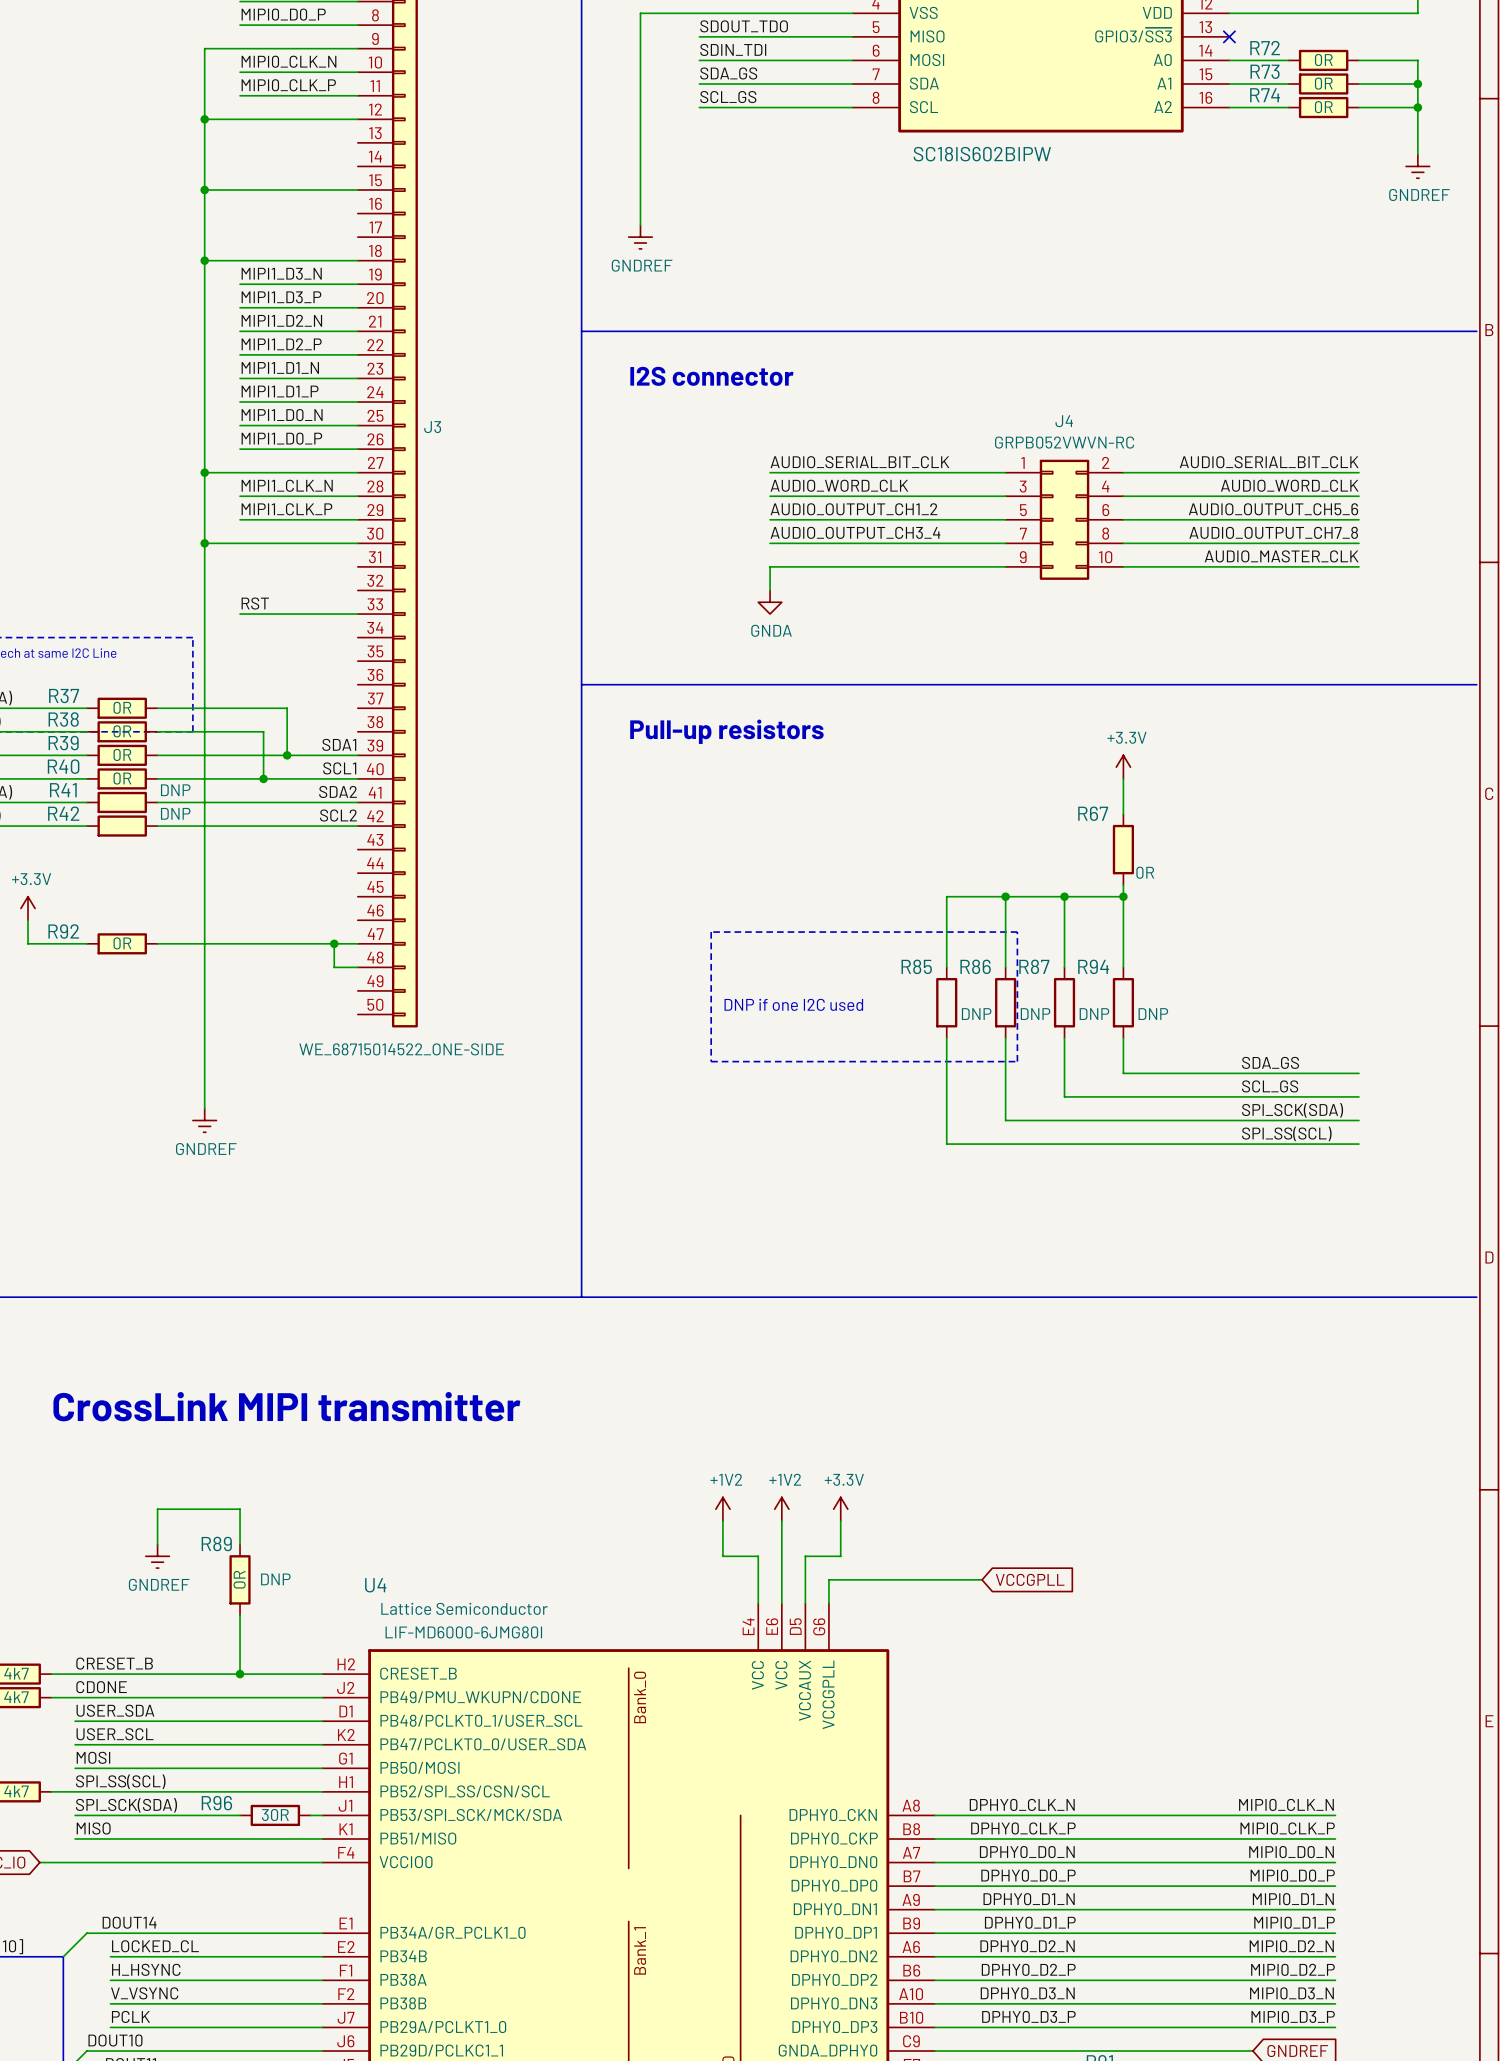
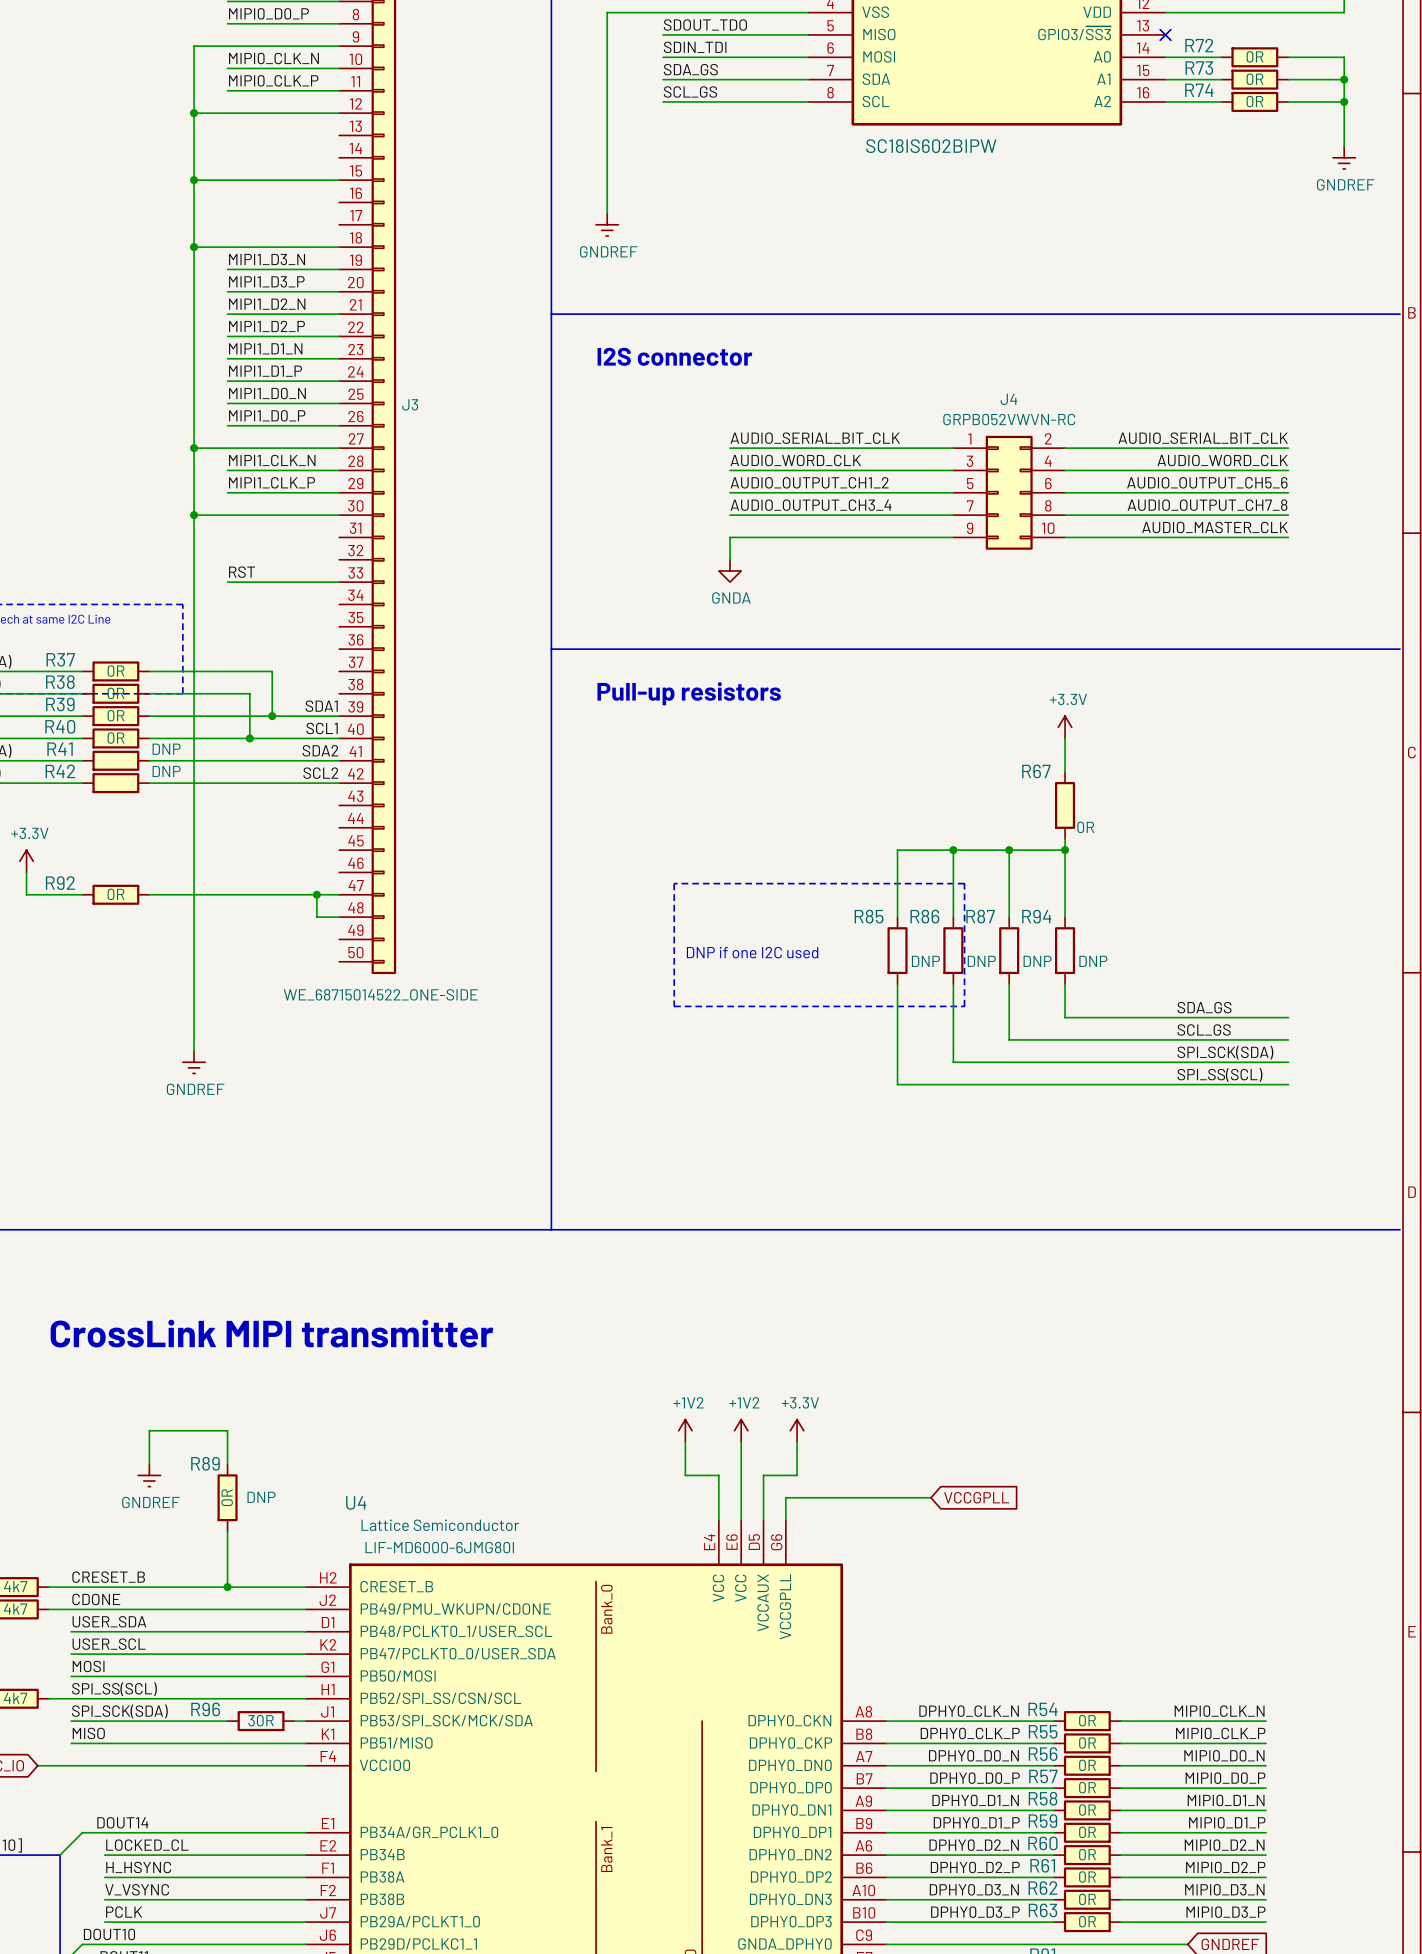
R54: none -> (1087, 1721)
R55: none -> (1087, 1743)
R56: none -> (1087, 1765)
R57: none -> (1087, 1788)
R58: none -> (1087, 1810)
R59: none -> (1087, 1832)
R60: none -> (1087, 1855)
R61: none -> (1087, 1877)
R62: none -> (1087, 1899)
R63: none -> (1087, 1922)

